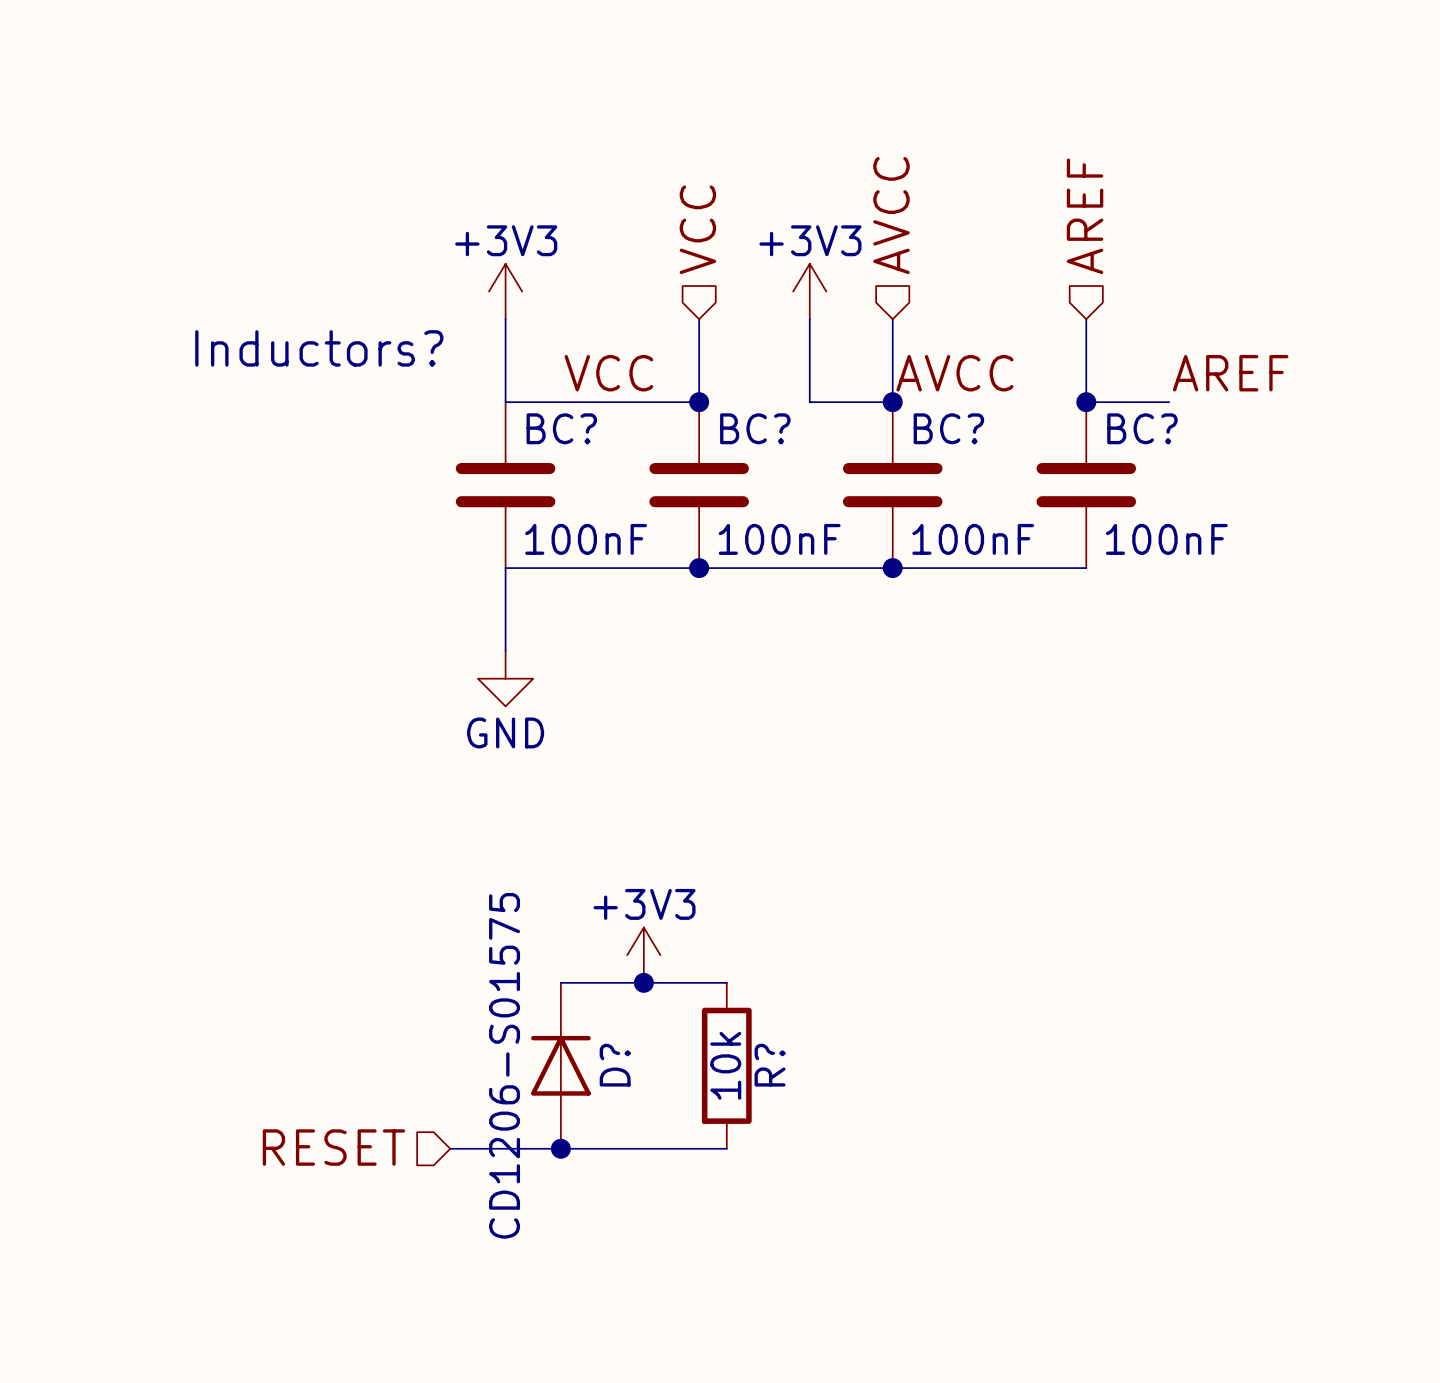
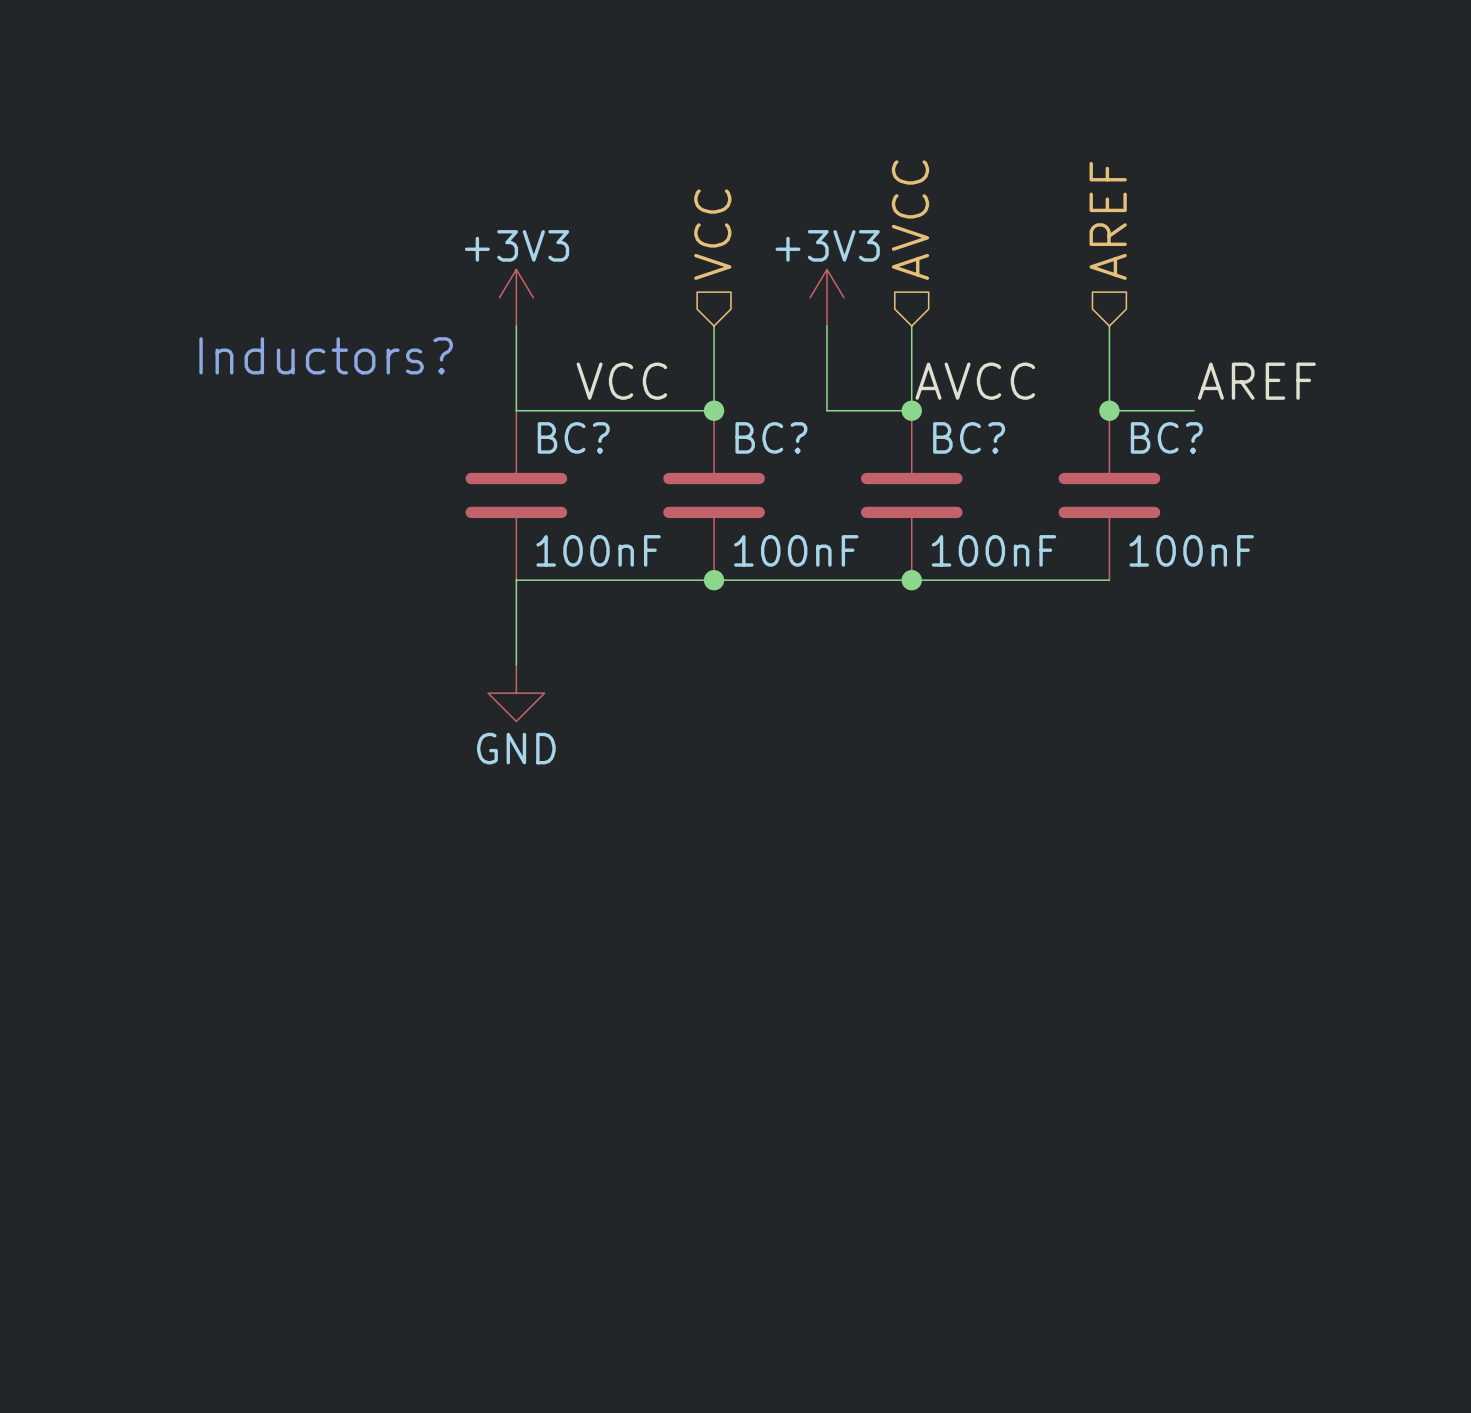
power symbol: +3V3 (643, 955) -> none
wire: (560, 982) (726, 982) -> none
junction: (643, 982) -> none
D?: CD1206-S01575 (560, 1065) -> none
R?: 10k (726, 1065) -> none
hierarchical label: RESET (333, 1147) -> none
wire: (450, 1148) (726, 1148) -> none
junction: (560, 1148) -> none

